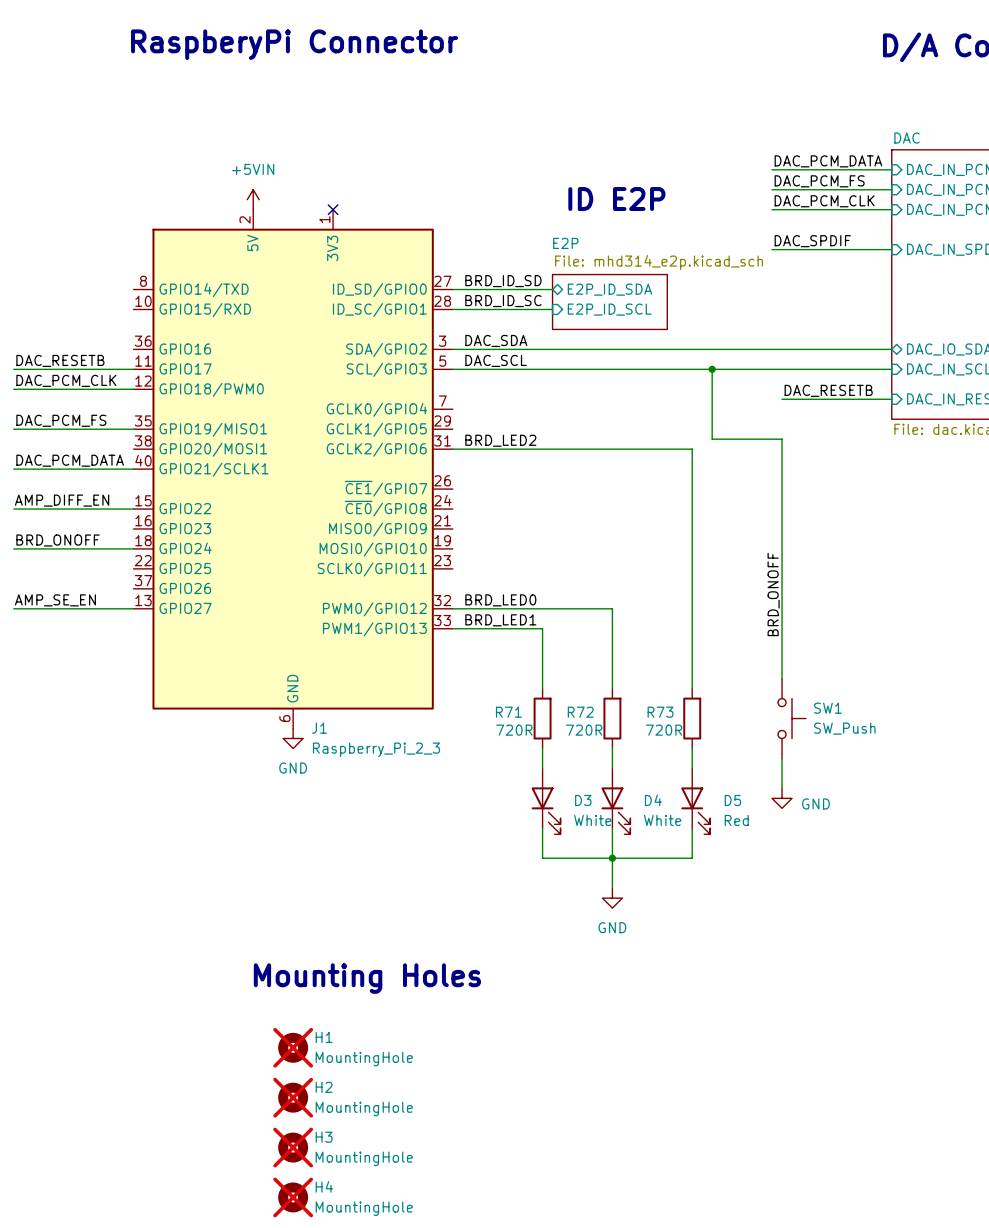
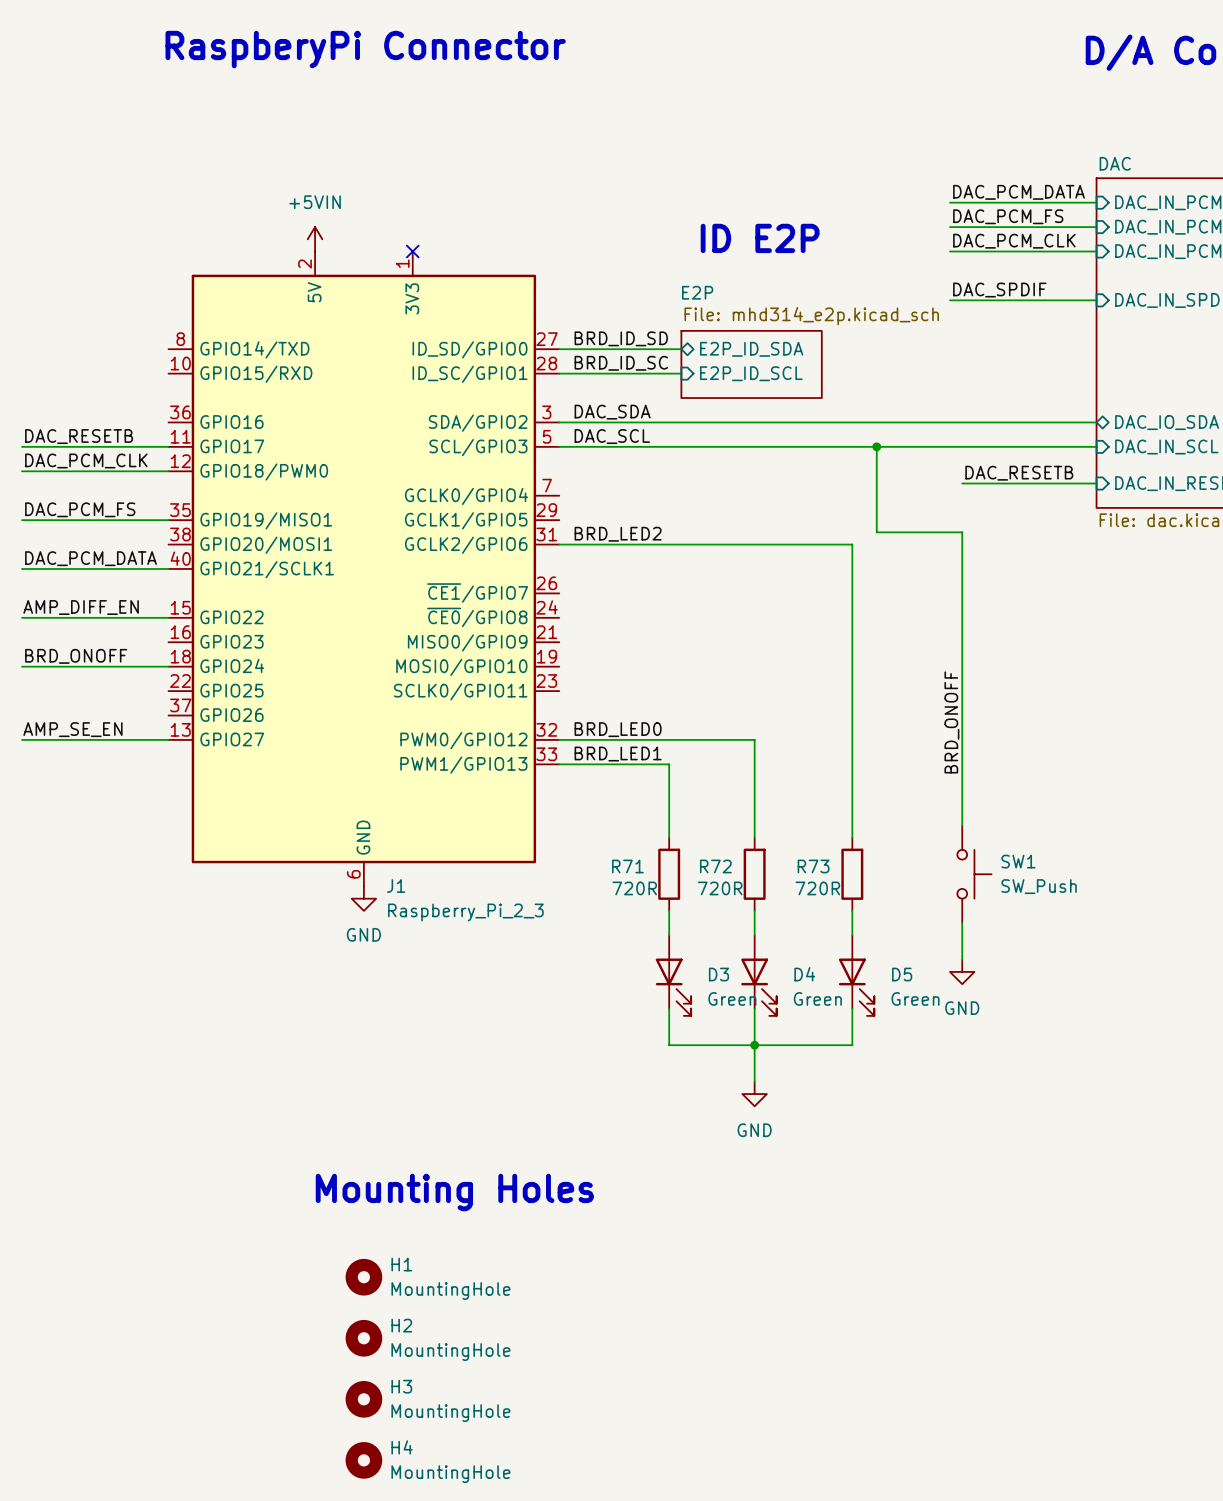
power symbol text position: GND (815, 803) -> GND (962, 1008)
D3 value: White (592, 820) -> Green (732, 998)
D4 value: White (662, 820) -> Green (817, 998)
D5 value: Red (736, 820) -> Green (915, 998)
H1 do-not-place cross: (293, 1047) -> none
H2 do-not-place cross: (293, 1097) -> none
H3 do-not-place cross: (293, 1147) -> none
H4 do-not-place cross: (293, 1197) -> none

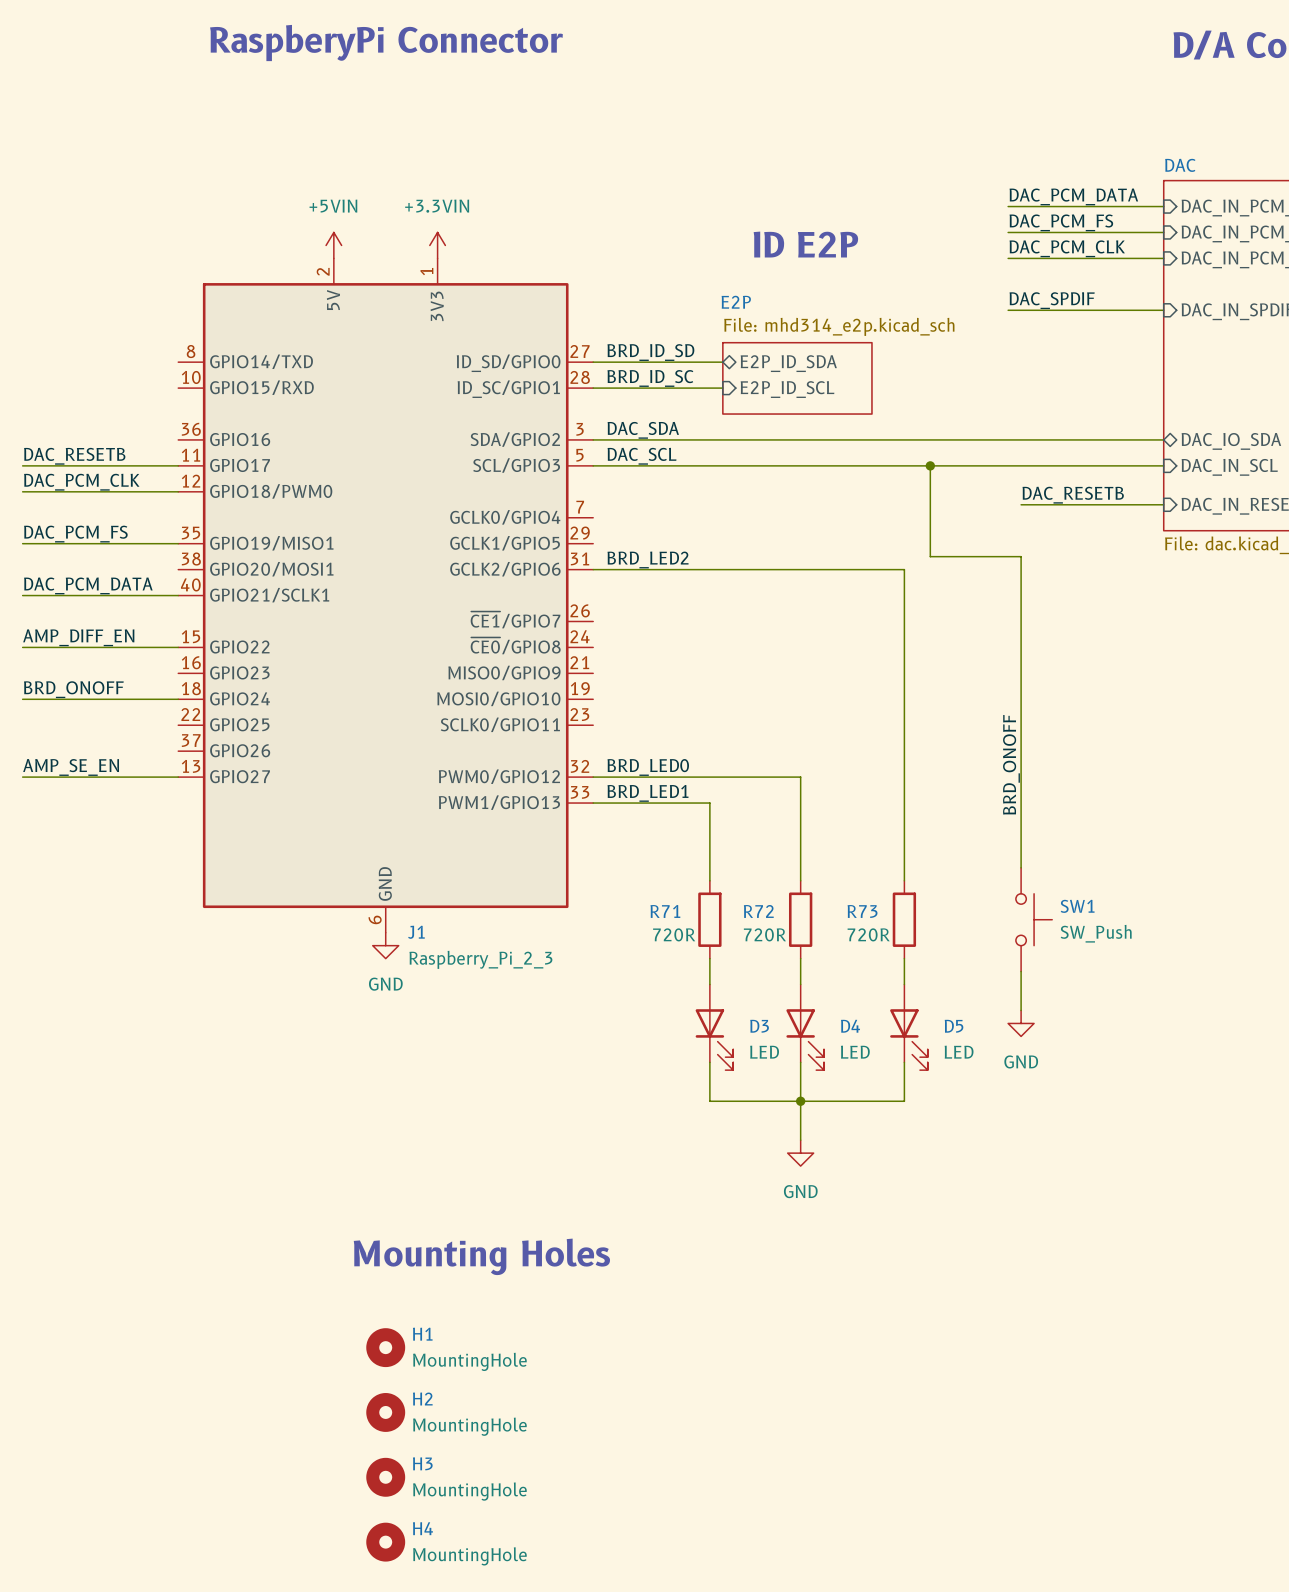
power symbol: none -> +3.3VIN (437, 245)
no-connect mark: (412, 251) -> none
D3 value: Green (732, 998) -> LED (764, 1052)
D4 value: Green (817, 998) -> LED (855, 1052)
D5 value: Green (915, 998) -> LED (959, 1052)

